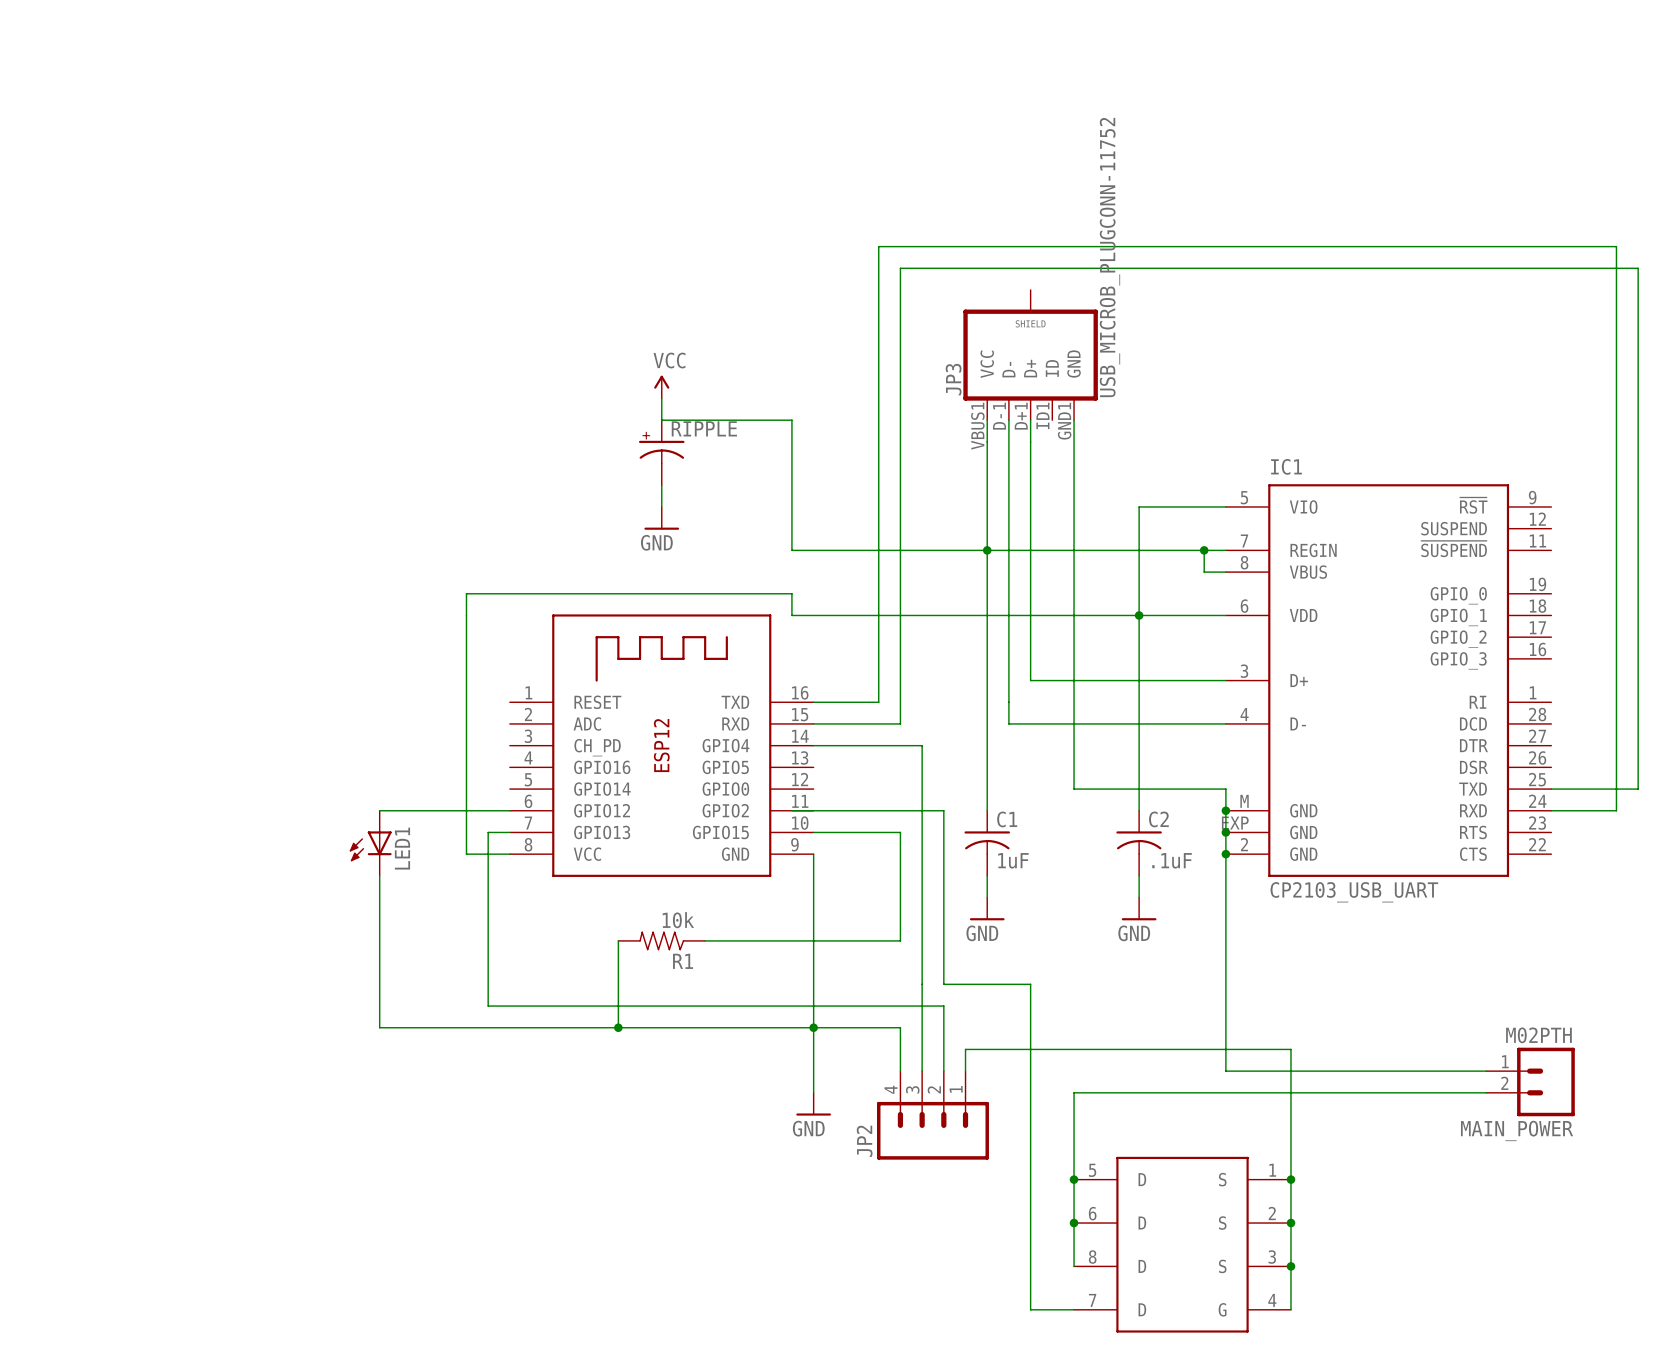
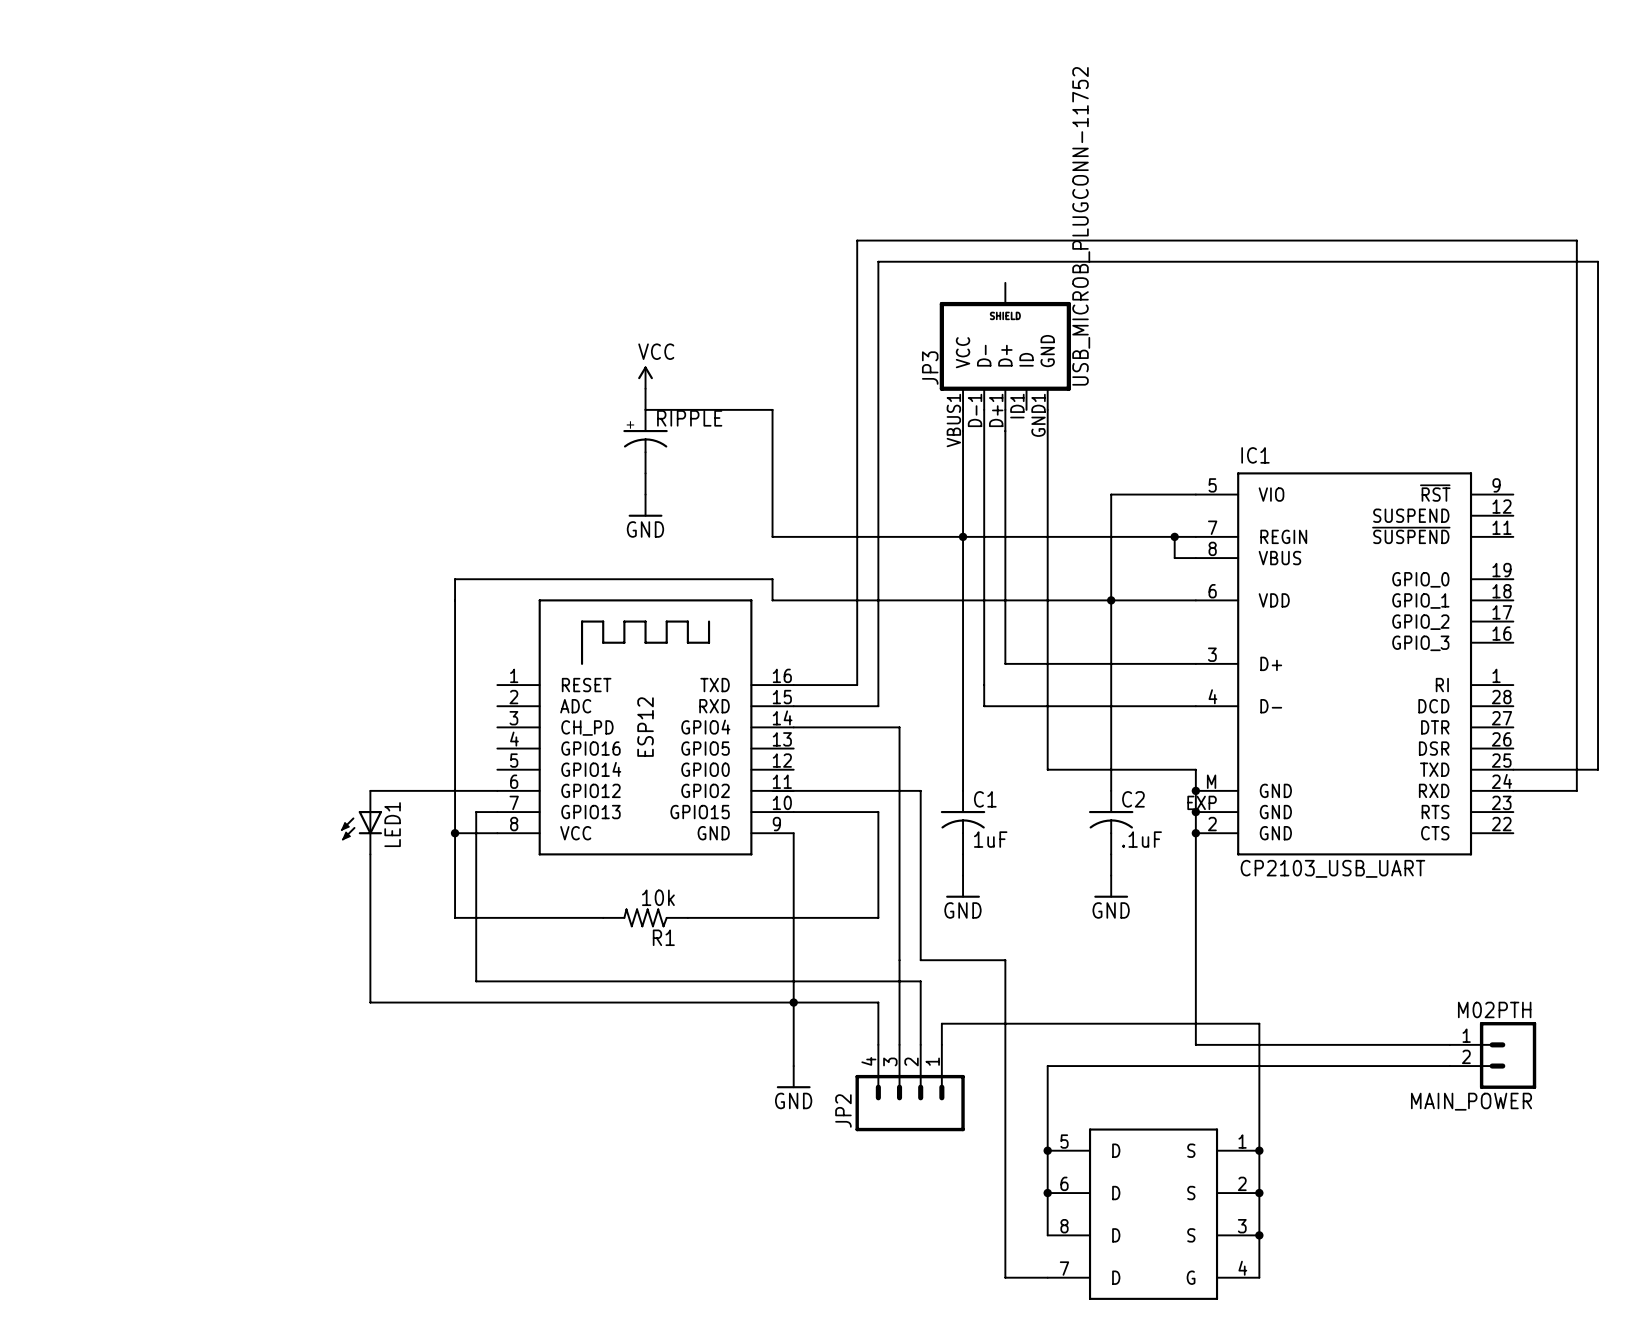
junction: none -> (455, 833)
wire: (618, 940) (618, 1027) -> (603, 917) (455, 917) (455, 833)
junction: (618, 1027) -> none

